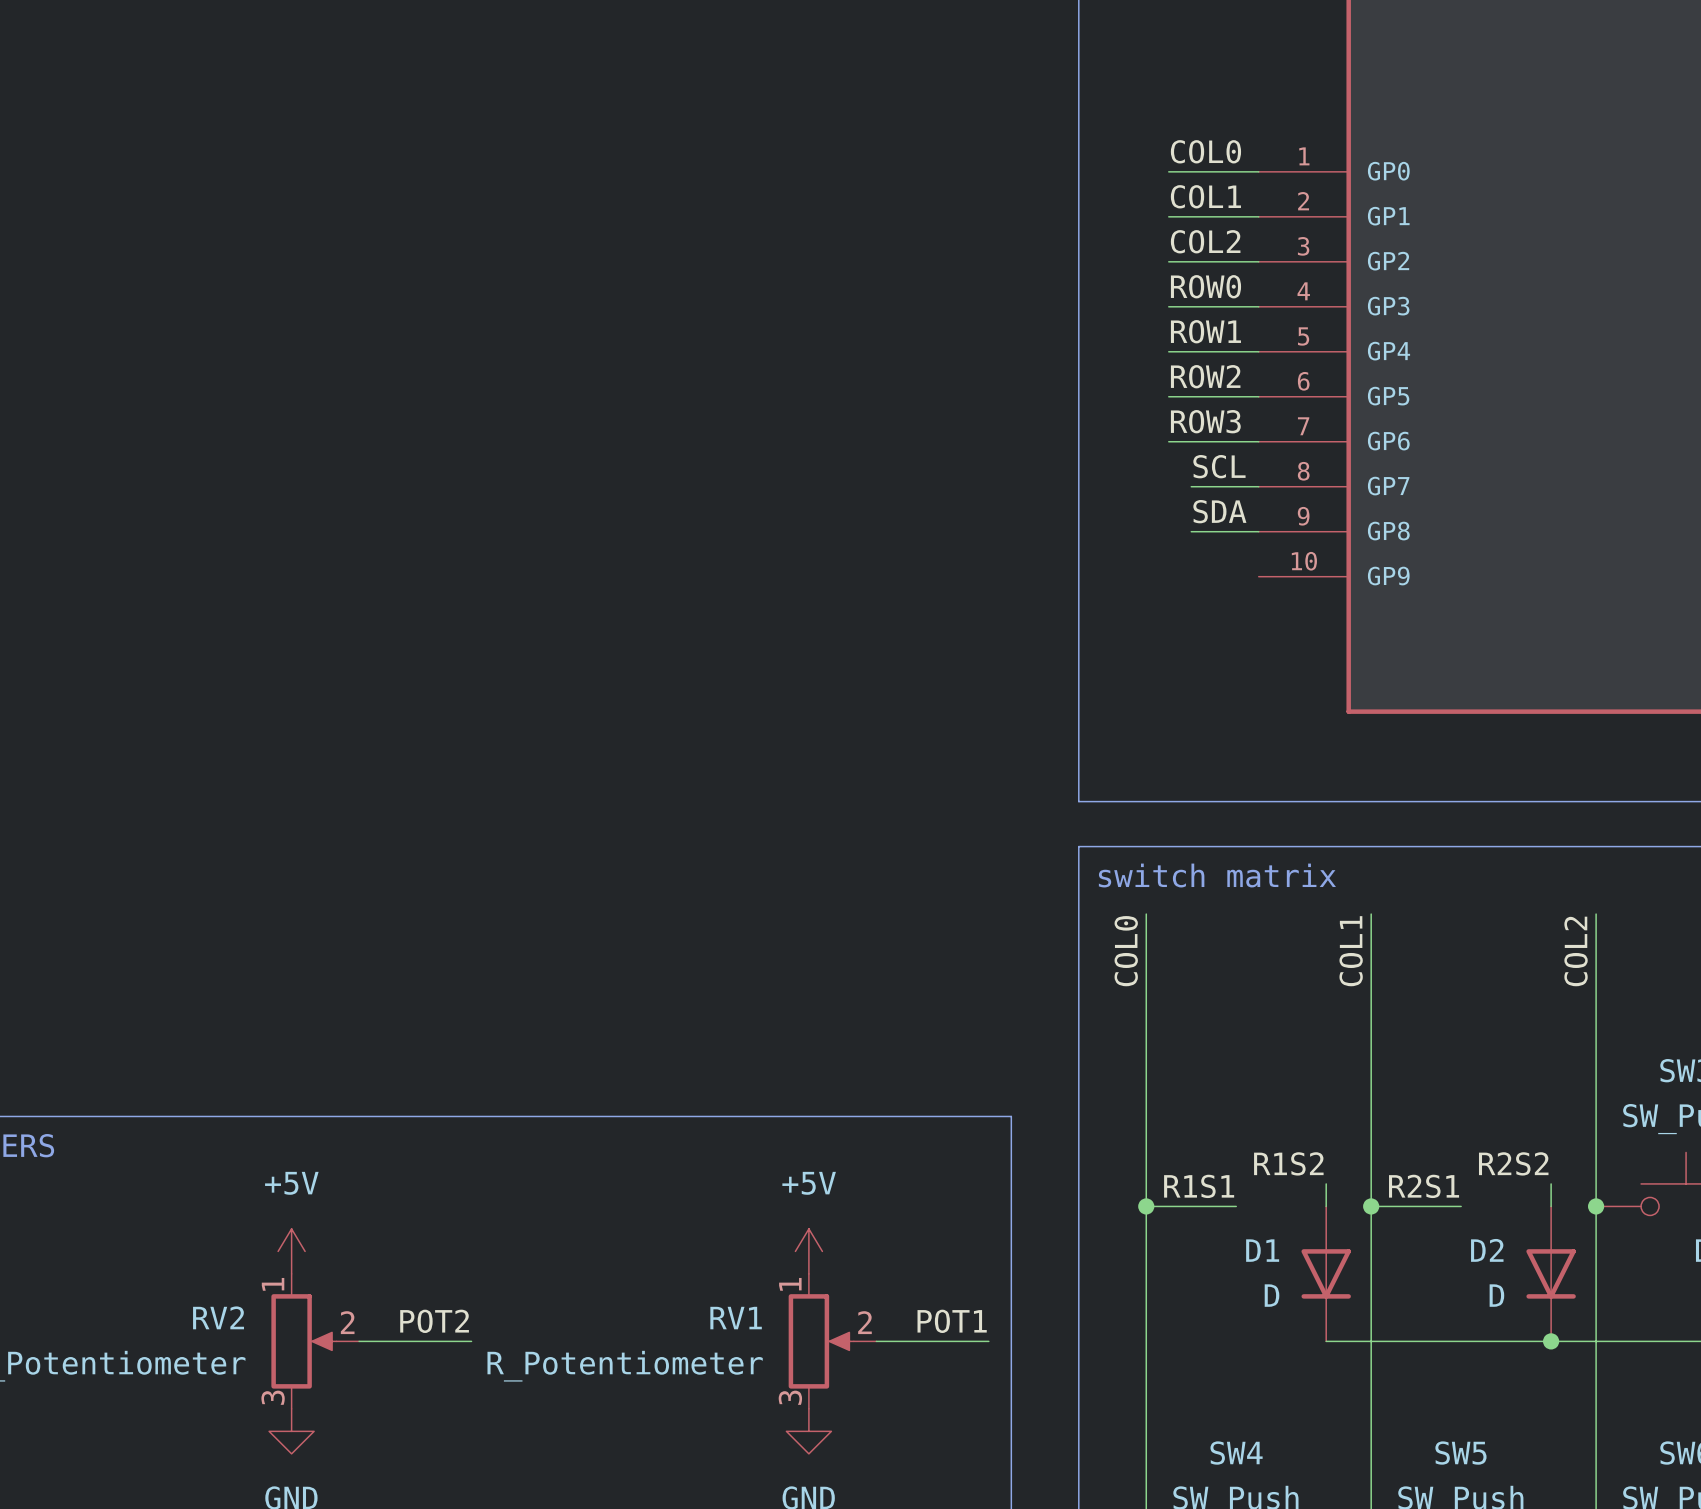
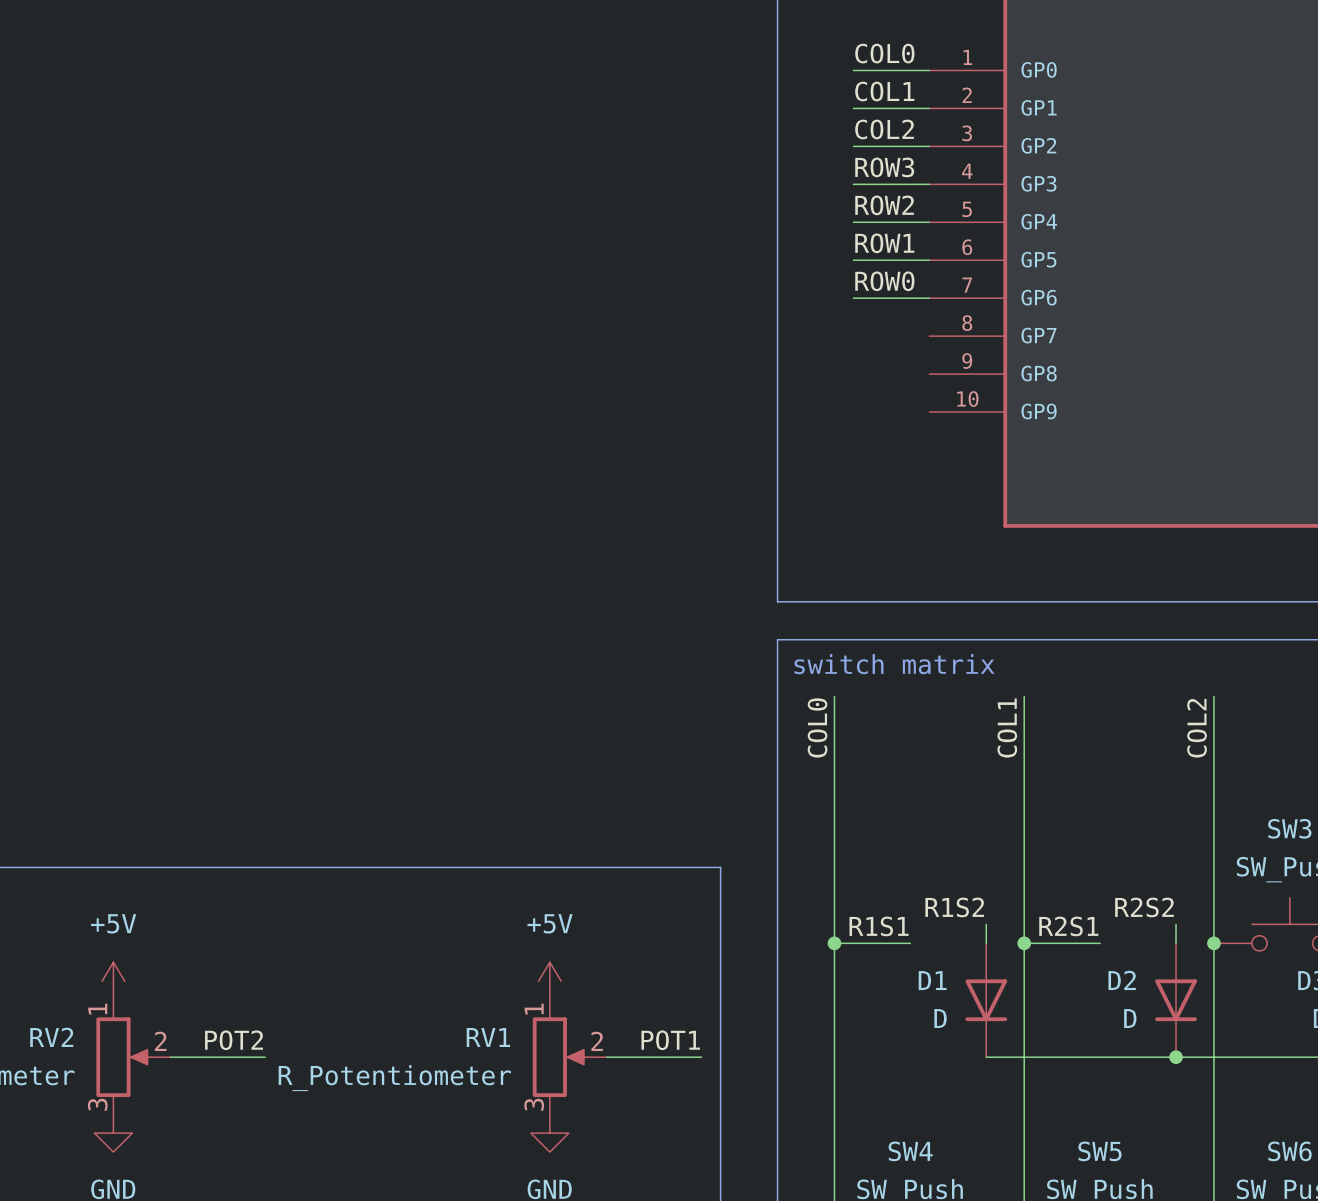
label: ROW0 (1205, 286) -> ROW3 (884, 167)
label: ROW1 (1205, 331) -> ROW2 (884, 205)
label: ROW2 (1205, 376) -> ROW1 (884, 243)
label: ROW3 (1205, 421) -> ROW0 (884, 281)
label: SCL (1219, 466) -> none
wire: (1191, 486) (1258, 486) -> none
label: SDA (1219, 511) -> none
wire: (1191, 531) (1258, 531) -> none

